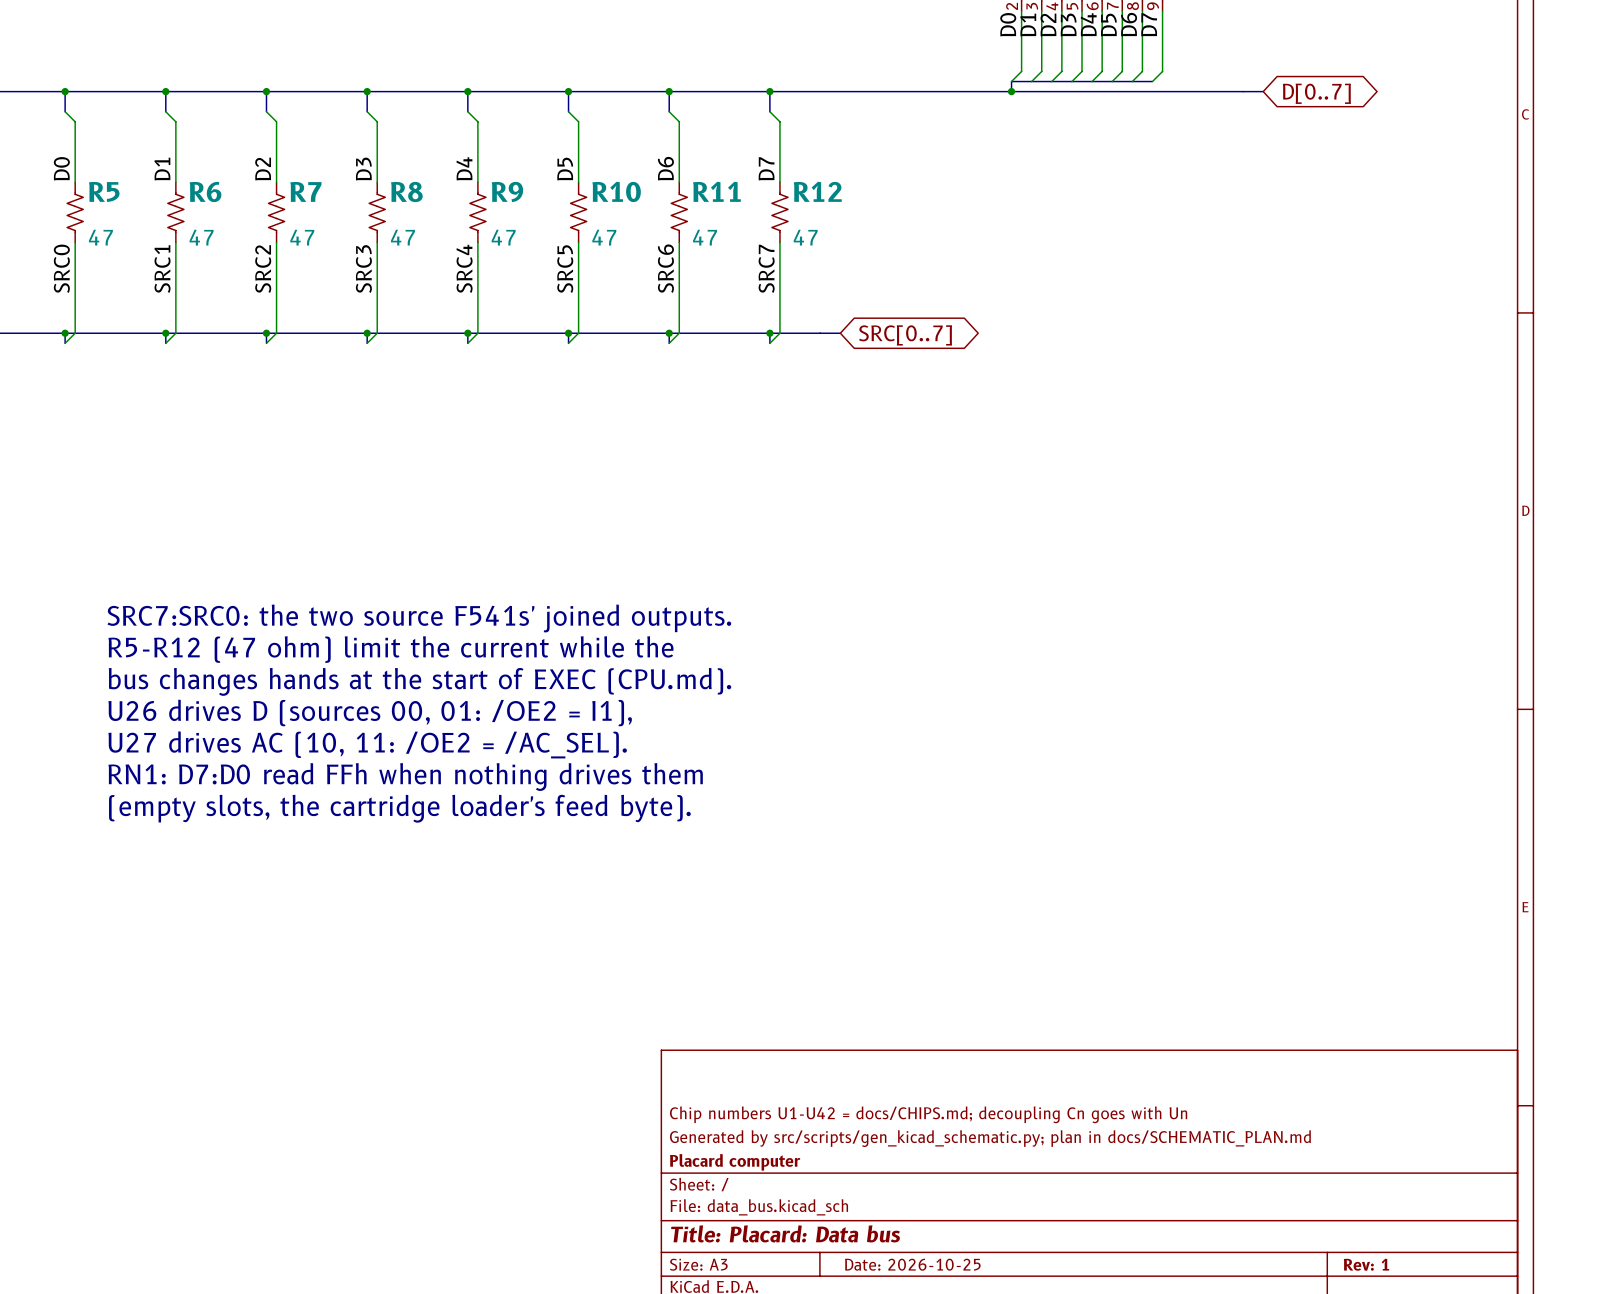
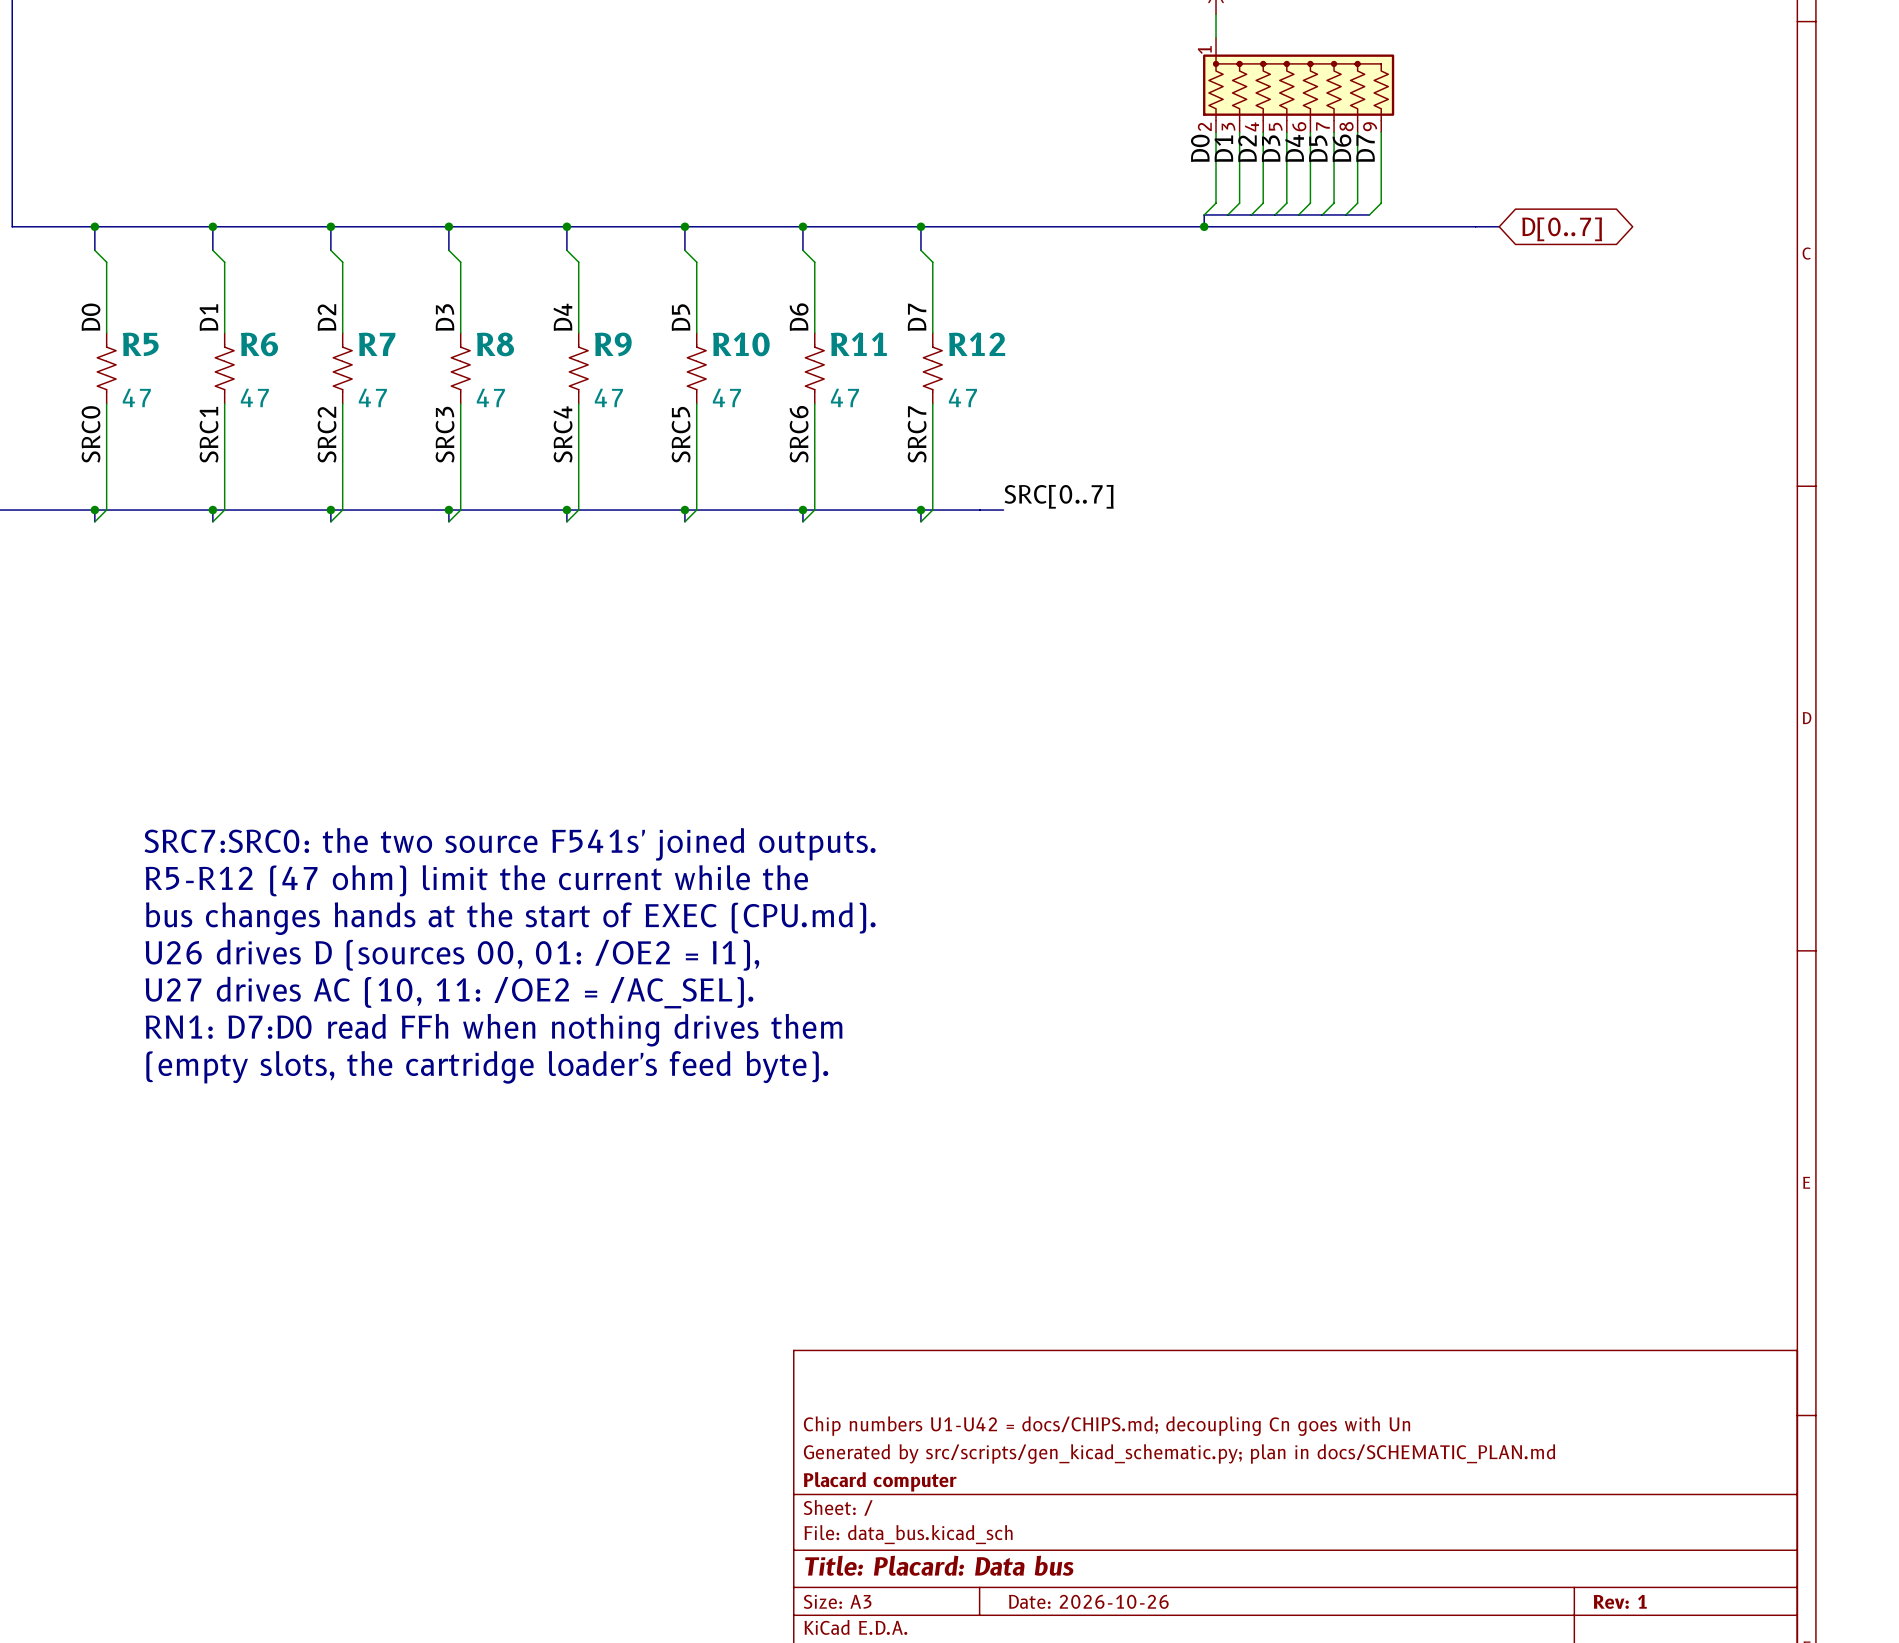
label: none -> SRC[0..7] (1059, 496)
global label: SRC[0..7] (905, 335) -> none
title block: Date: 2026-10-25 (912, 1264) -> Date: 2026-10-26 (1088, 1601)

